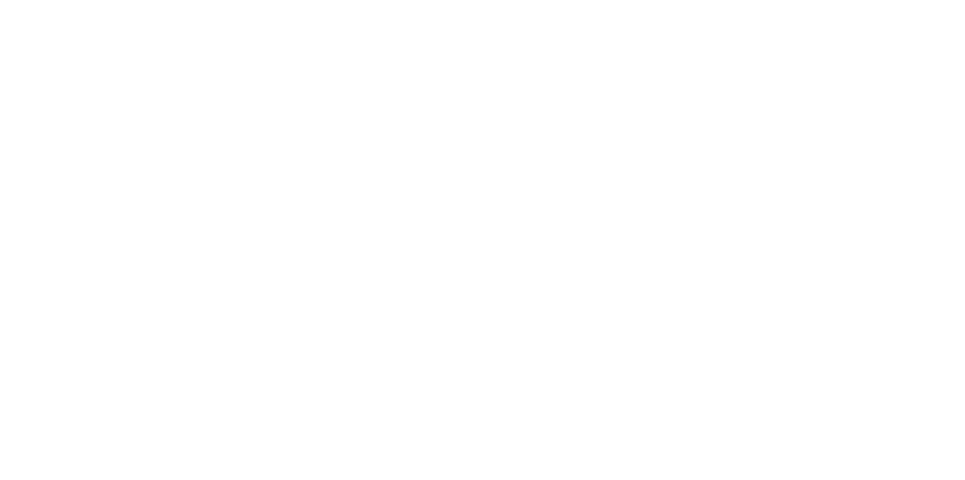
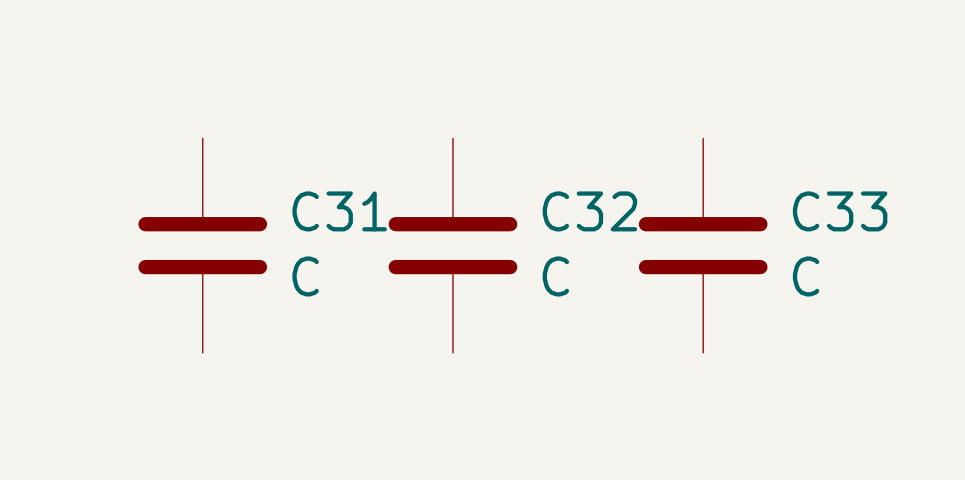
C31: none -> C (202, 245)
C32: none -> C (452, 245)
C33: none -> C (703, 245)

